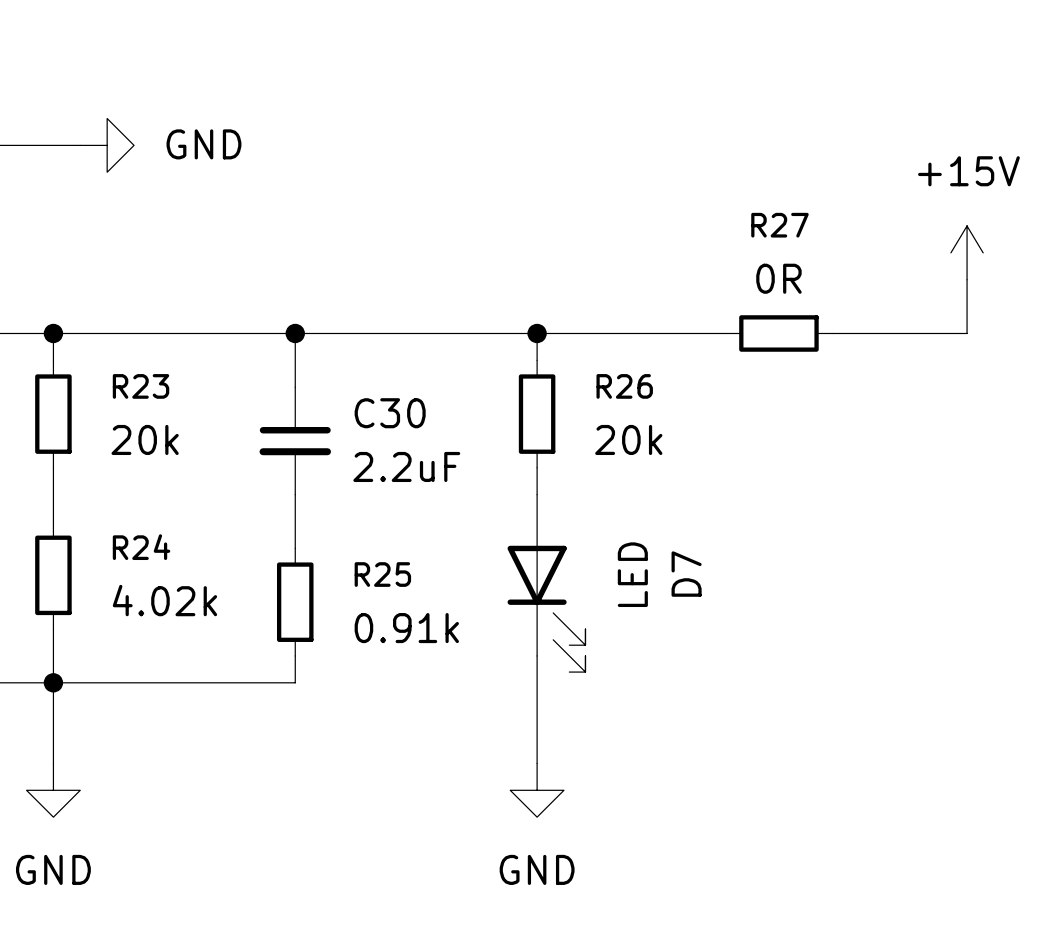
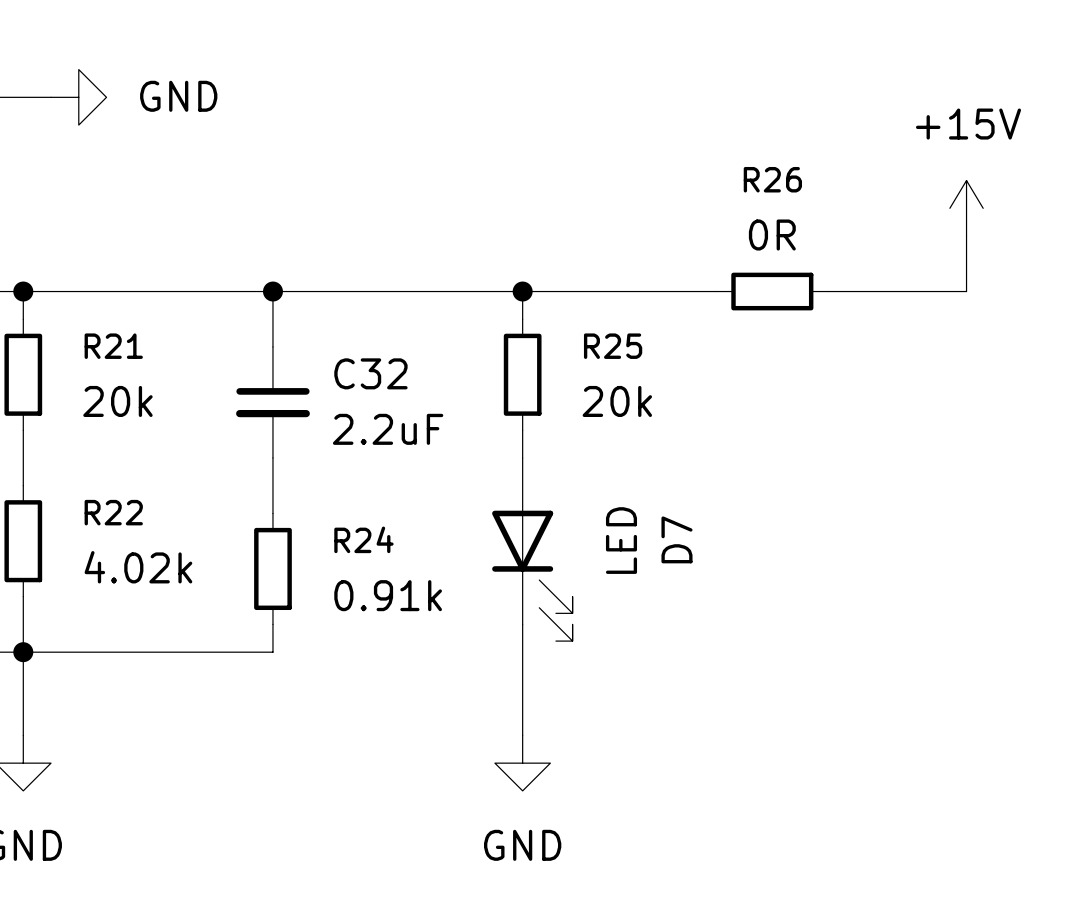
R27 name: R27 (779, 225) -> R26 (772, 179)
R23 name: R23 (141, 386) -> R21 (113, 346)
R26 name: R26 (624, 386) -> R25 (613, 346)
C30 name: C30 (390, 413) -> C32 (370, 373)
R24 name: R24 (141, 547) -> R22 (113, 512)
R25 name: R25 (382, 574) -> R24 (363, 539)

